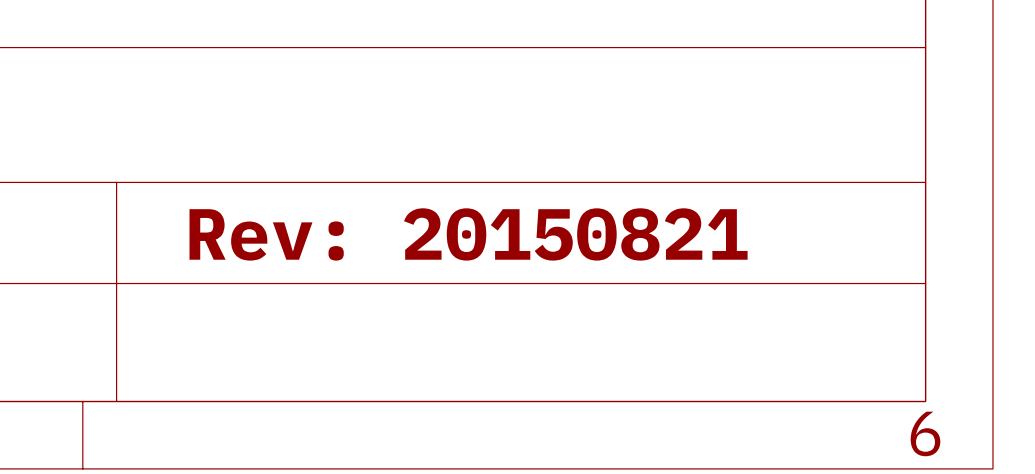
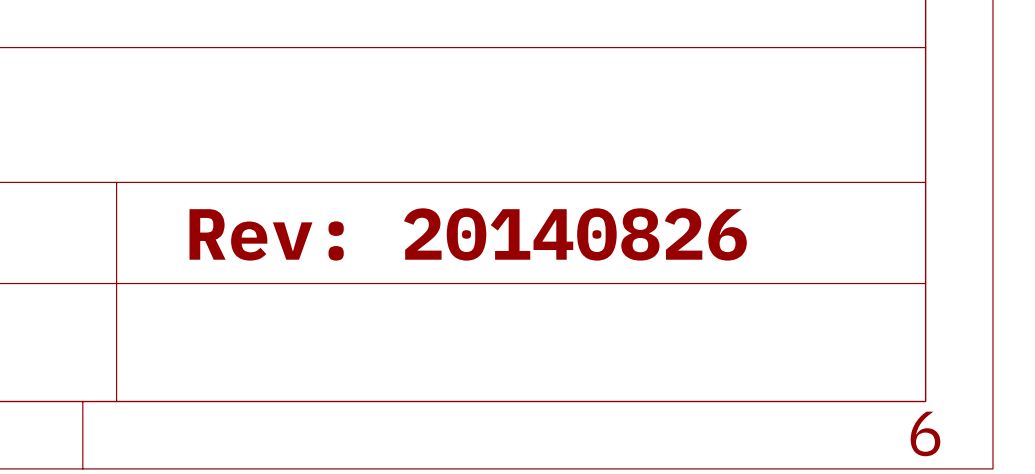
title block: Rev: 20150821 (468, 234) -> Rev: 20140826 (468, 234)

